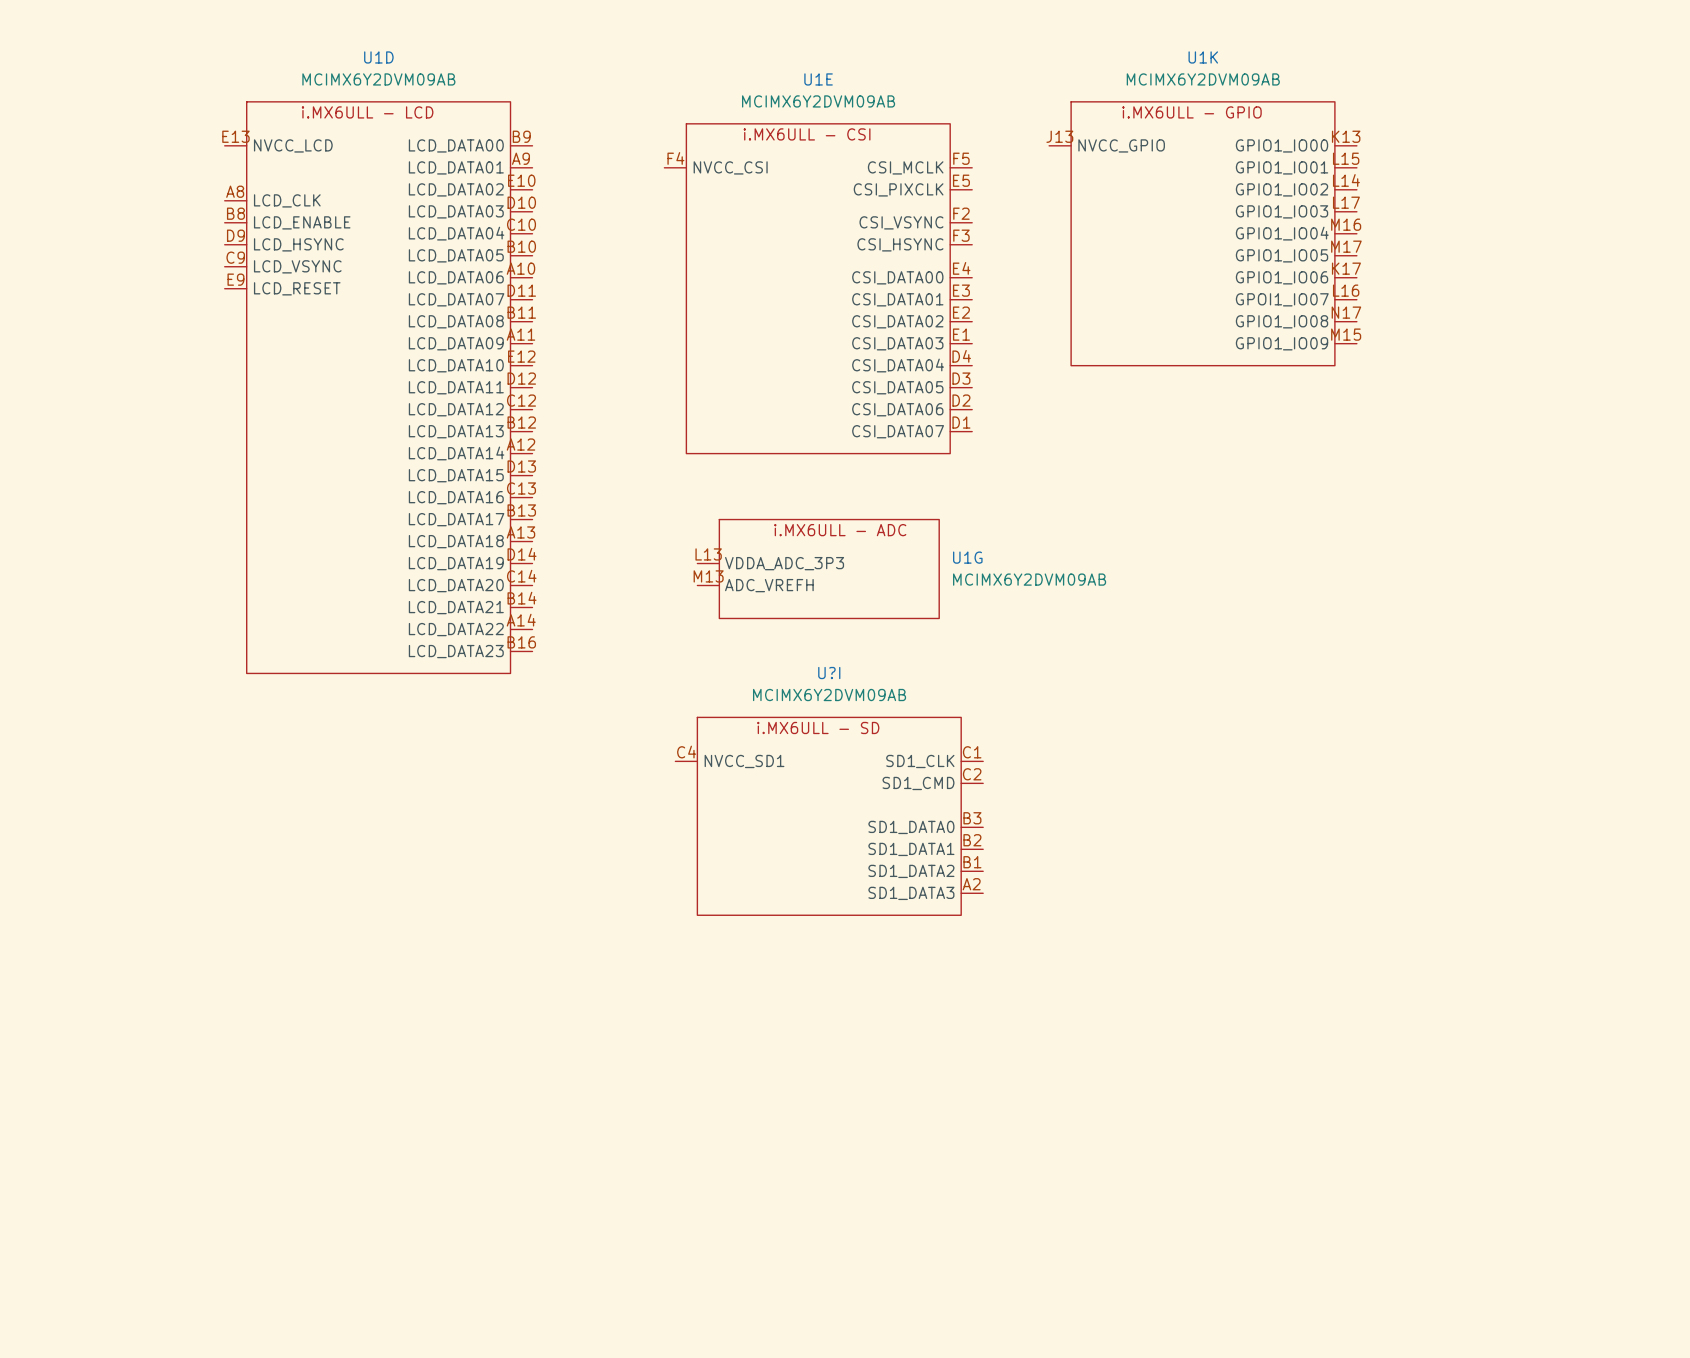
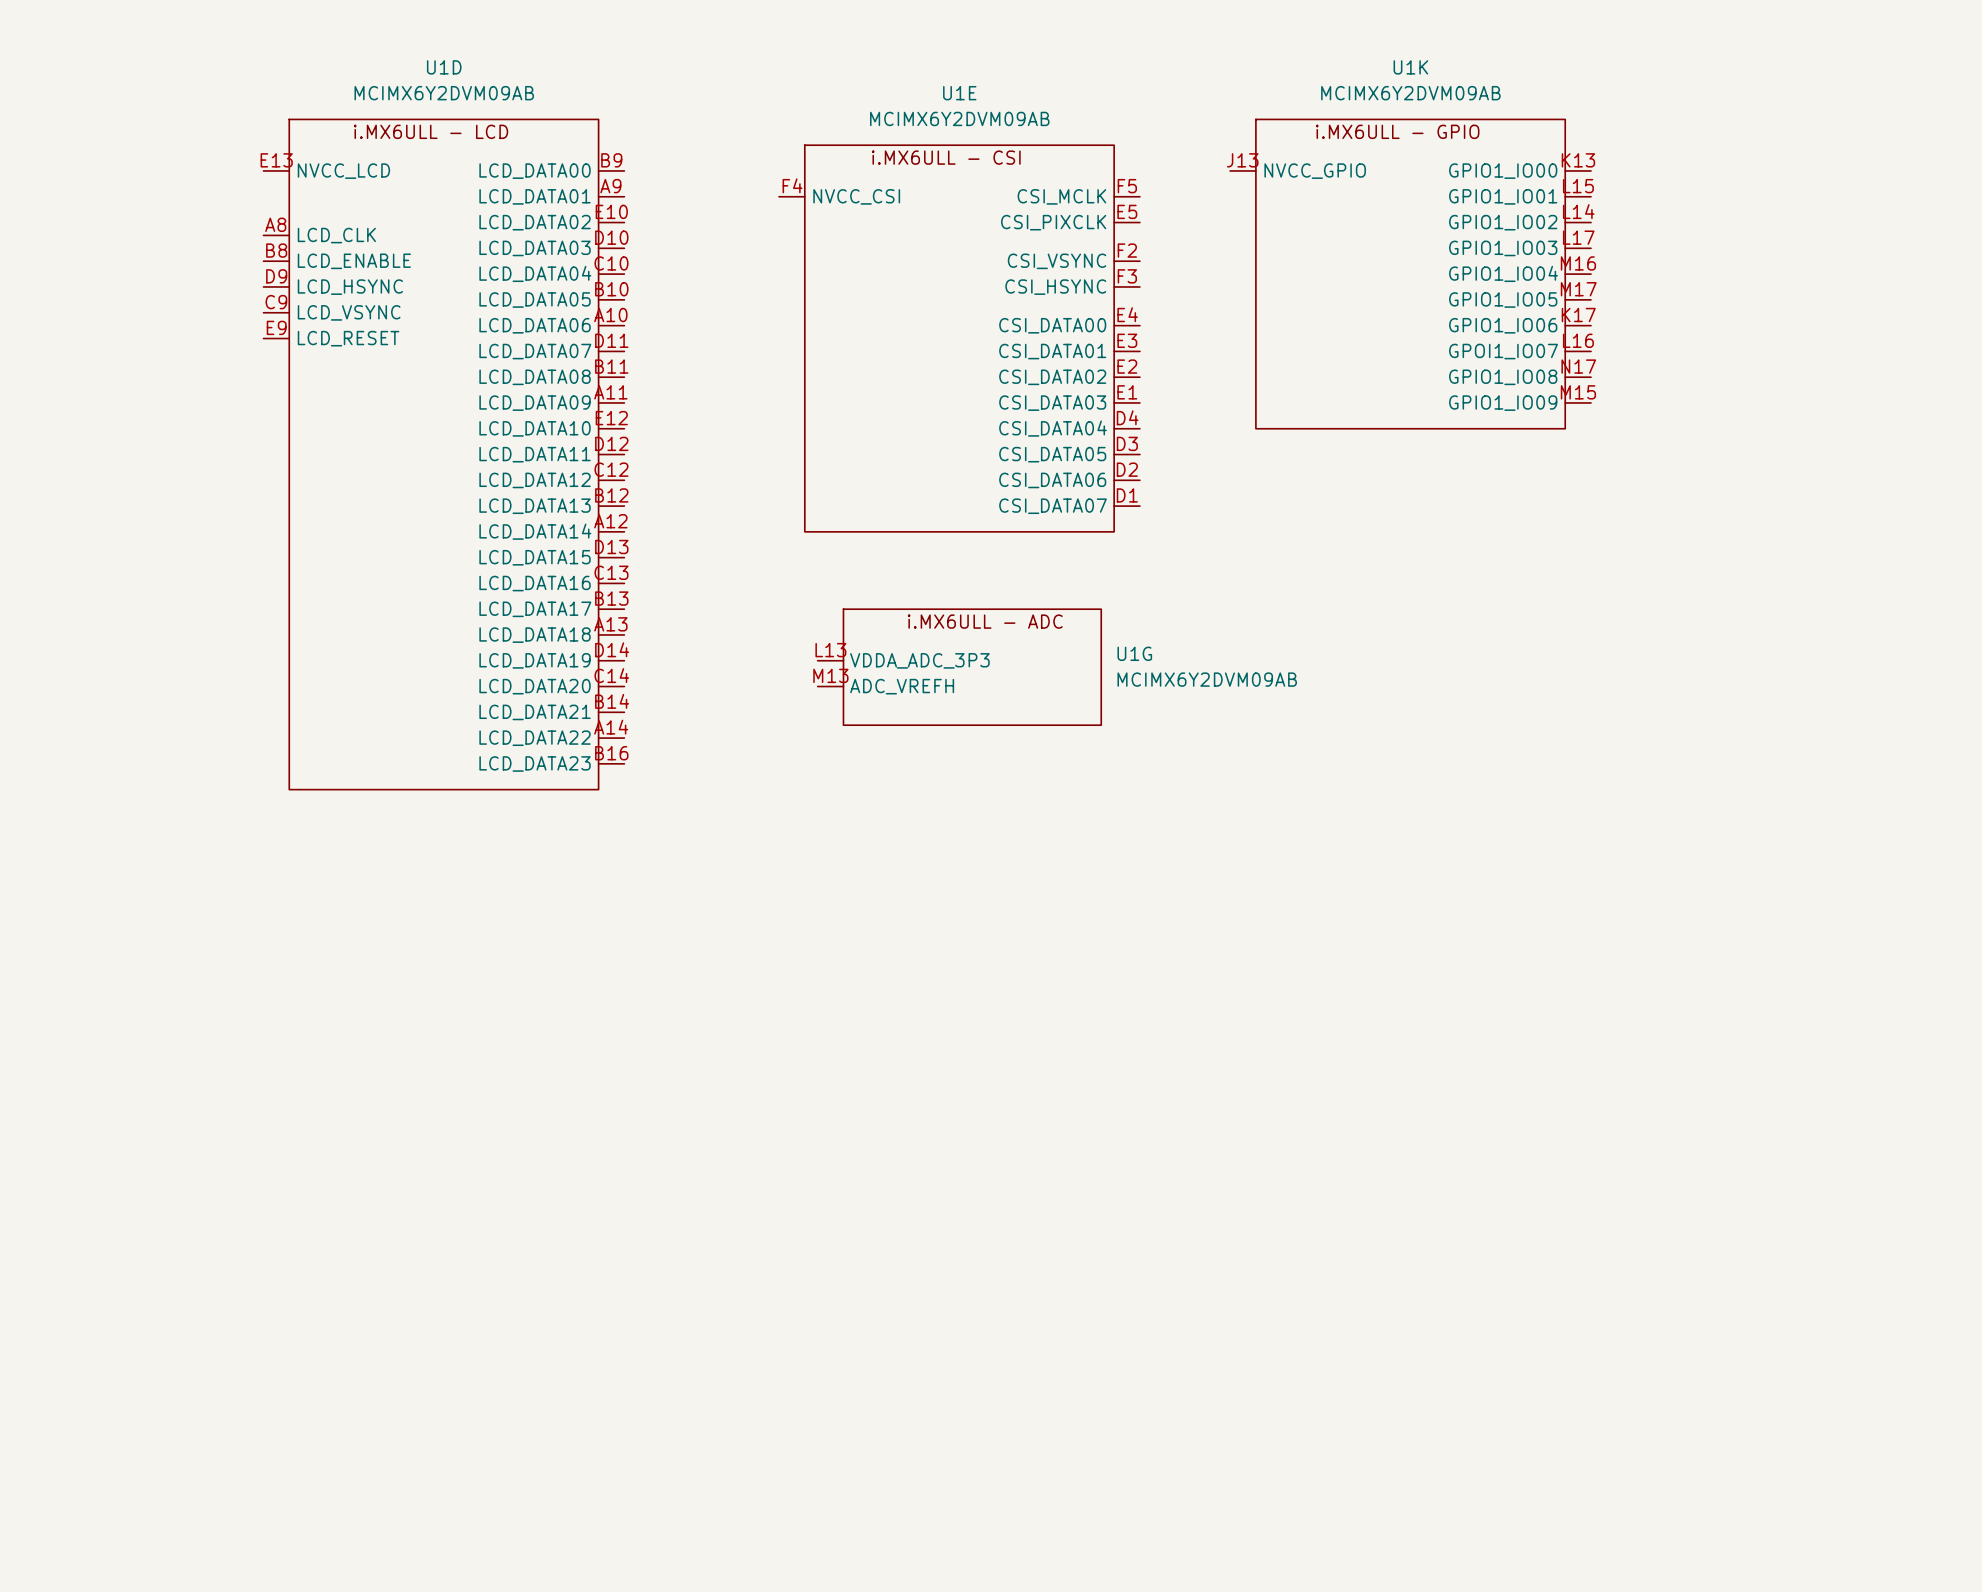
U?I: MCIMX6Y2DVM09AB (829, 816) -> none

